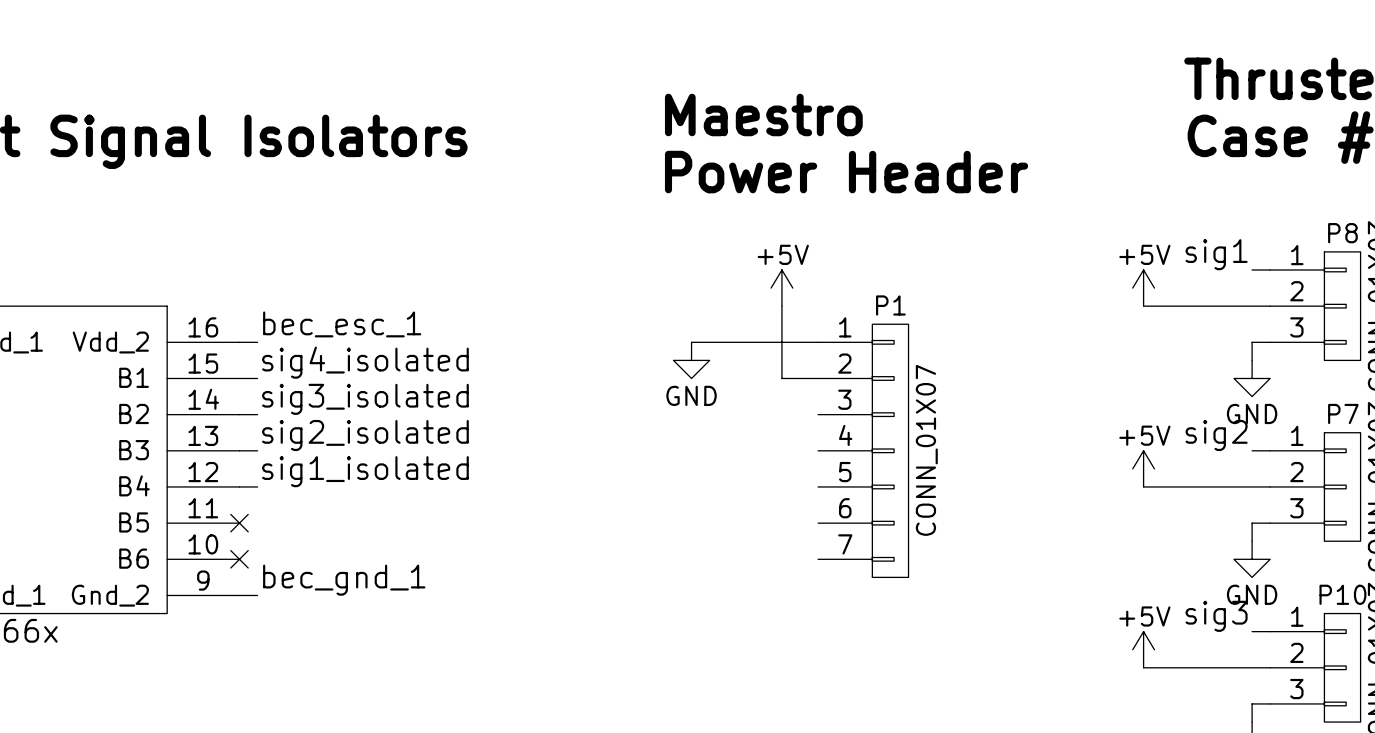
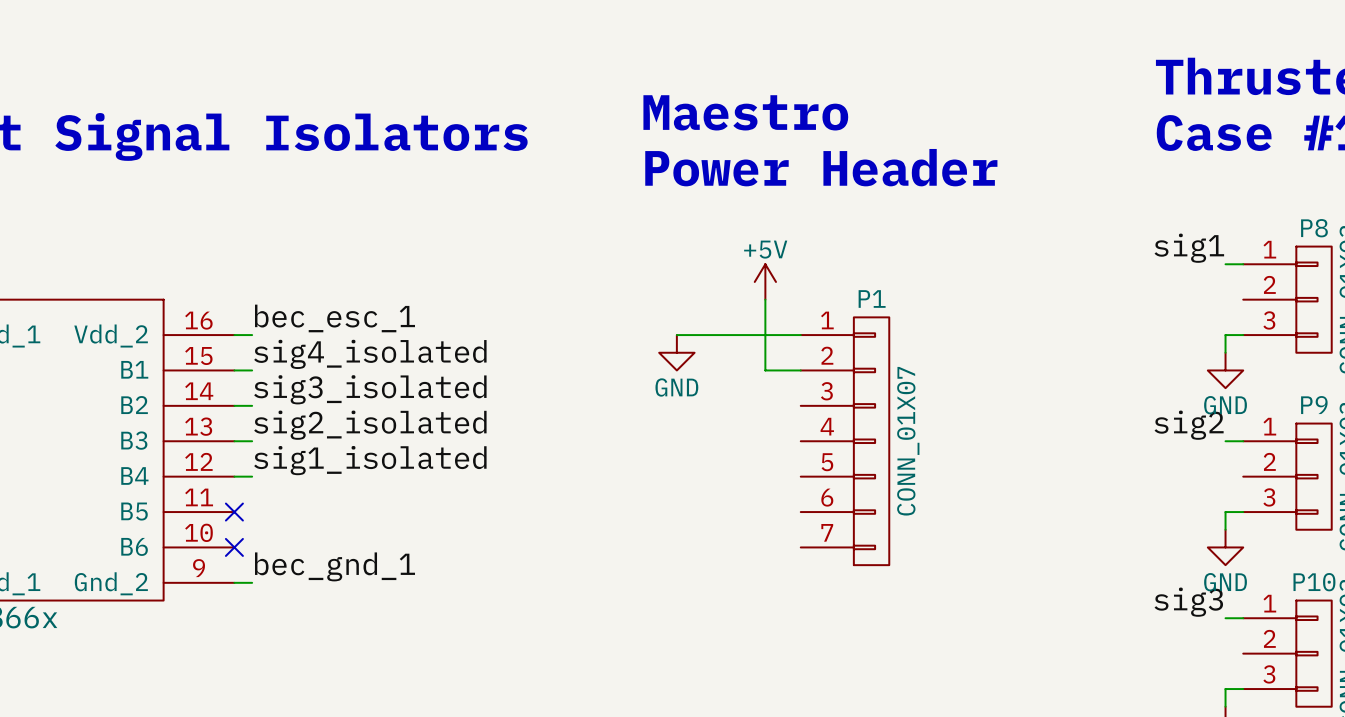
power symbol: +5V (1143, 288) -> none
wire: (1143, 306) (1270, 306) -> none
P7 name: P7 (1343, 413) -> P9 (1314, 405)
power symbol: +5V (1143, 468) -> none
wire: (1143, 486) (1270, 486) -> none
power symbol: +5V (1143, 649) -> none
wire: (1143, 667) (1270, 667) -> none

